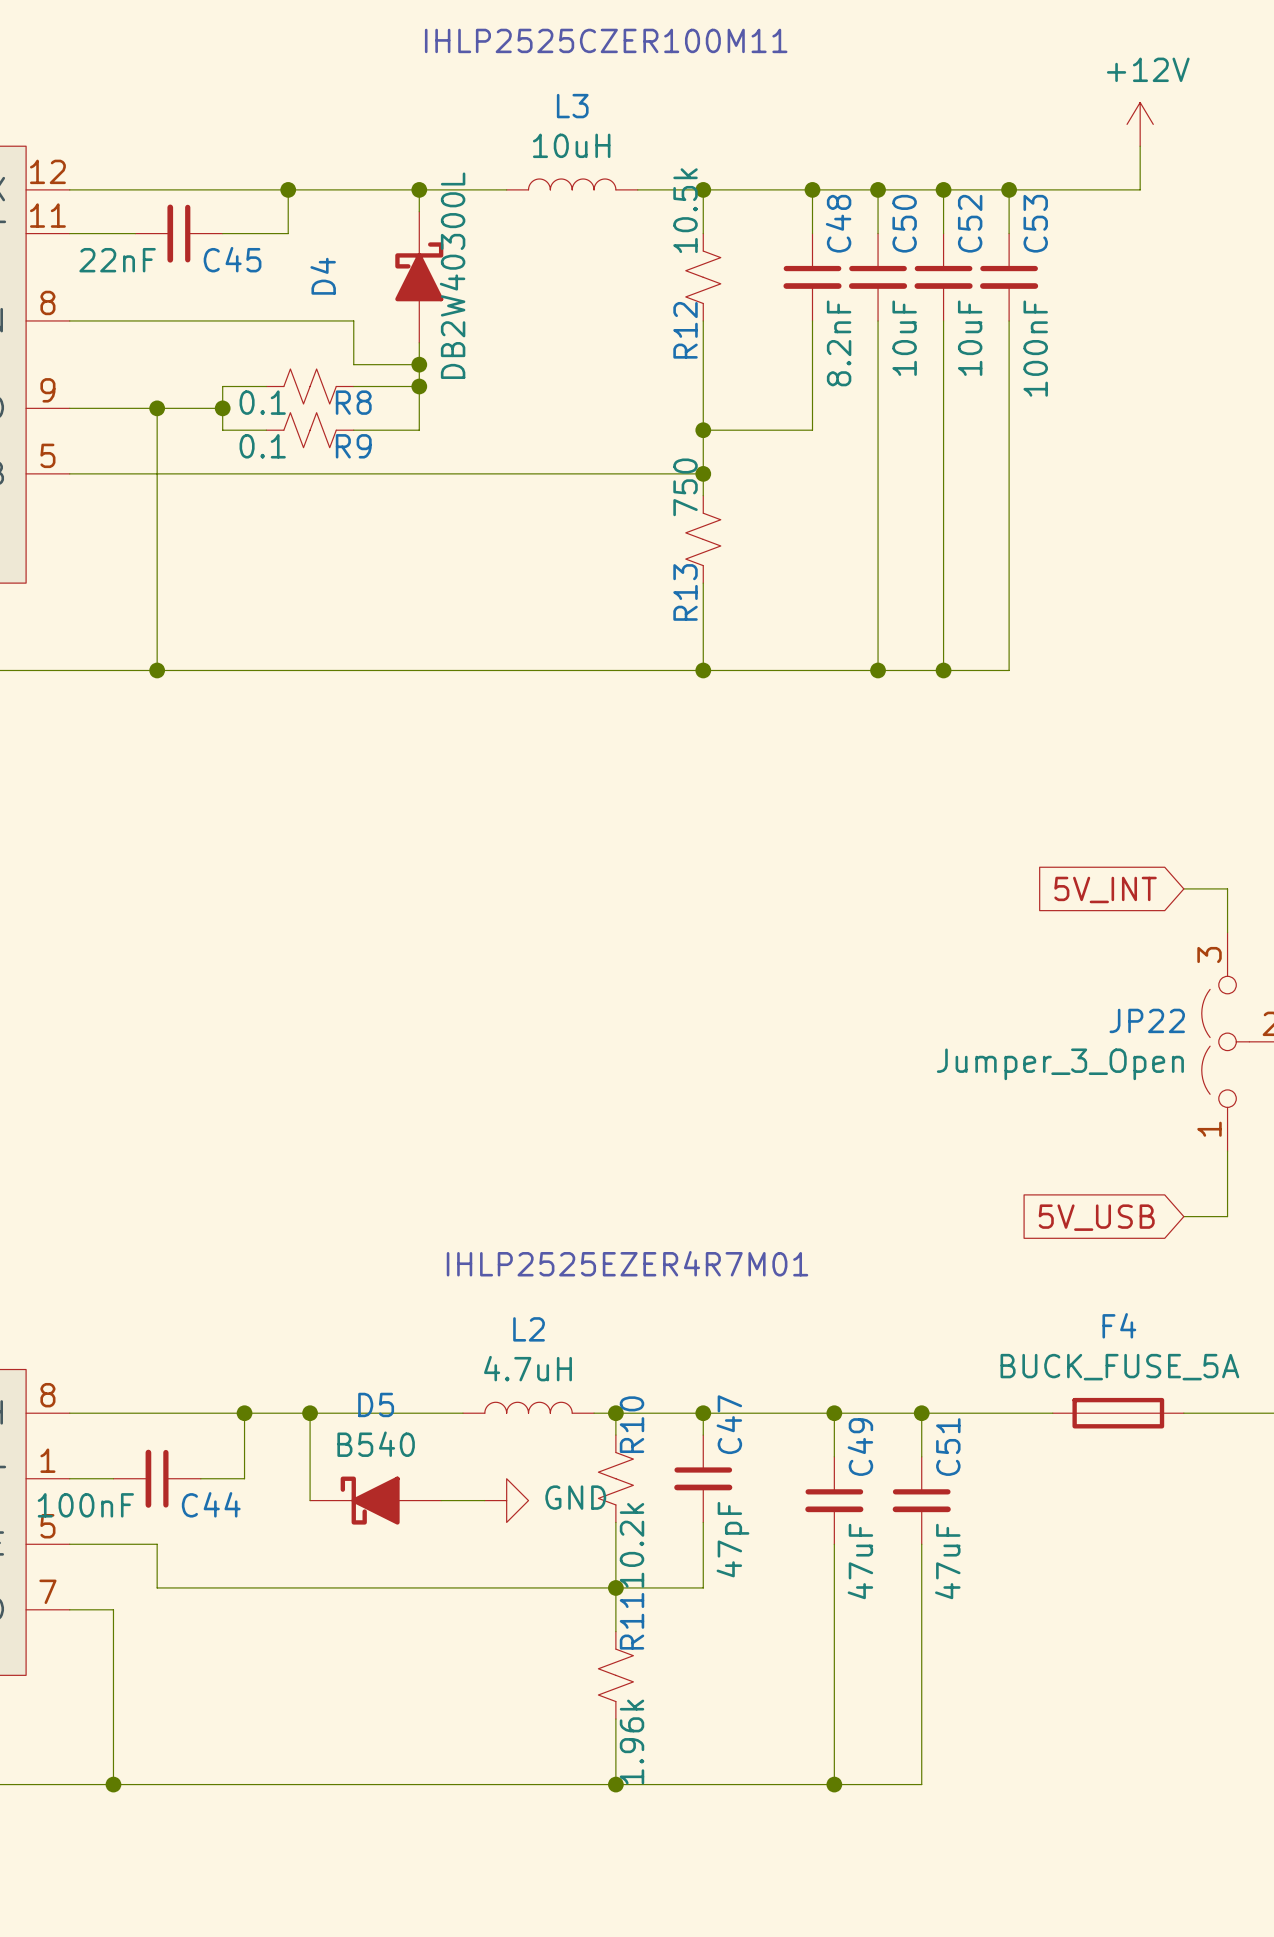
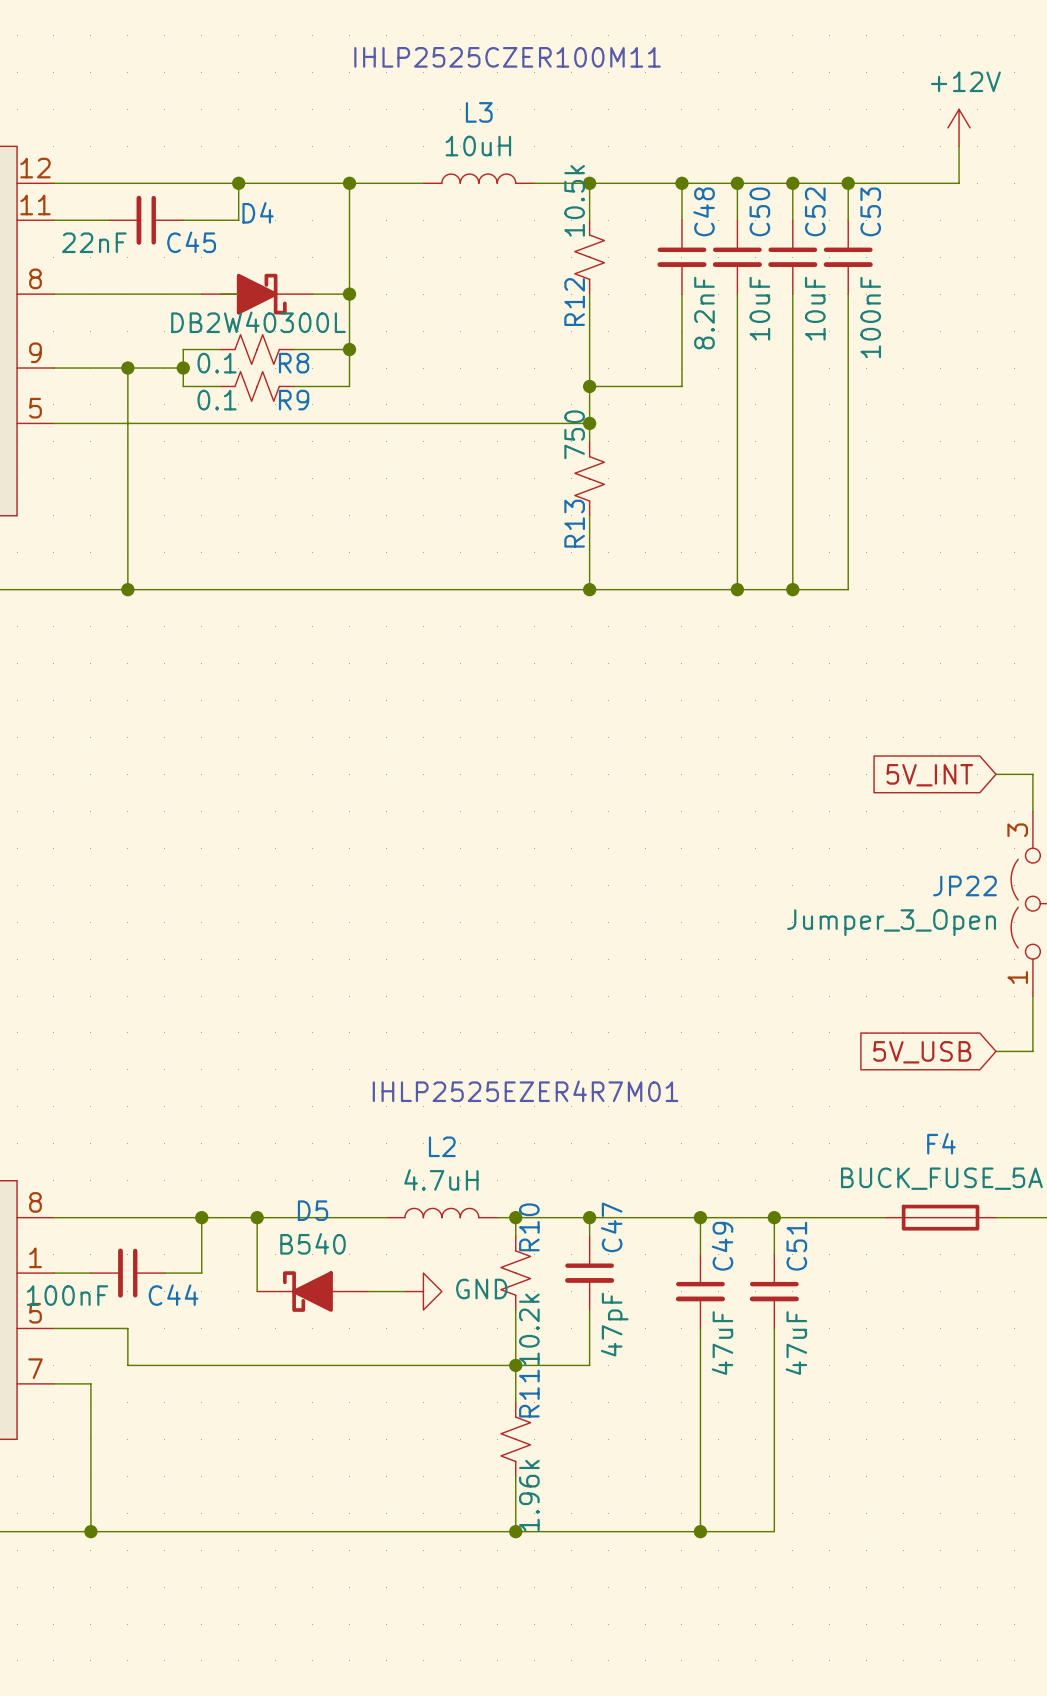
D4 rotation: 0° (419, 271) -> 90° clockwise (261, 294)
D4 position: (419, 277) -> (257, 294)
wire: (288, 320) (353, 320) (353, 364) (419, 364) -> none
wire: none -> (312, 294) (349, 294)
junction position: (419, 364) -> (349, 294)

